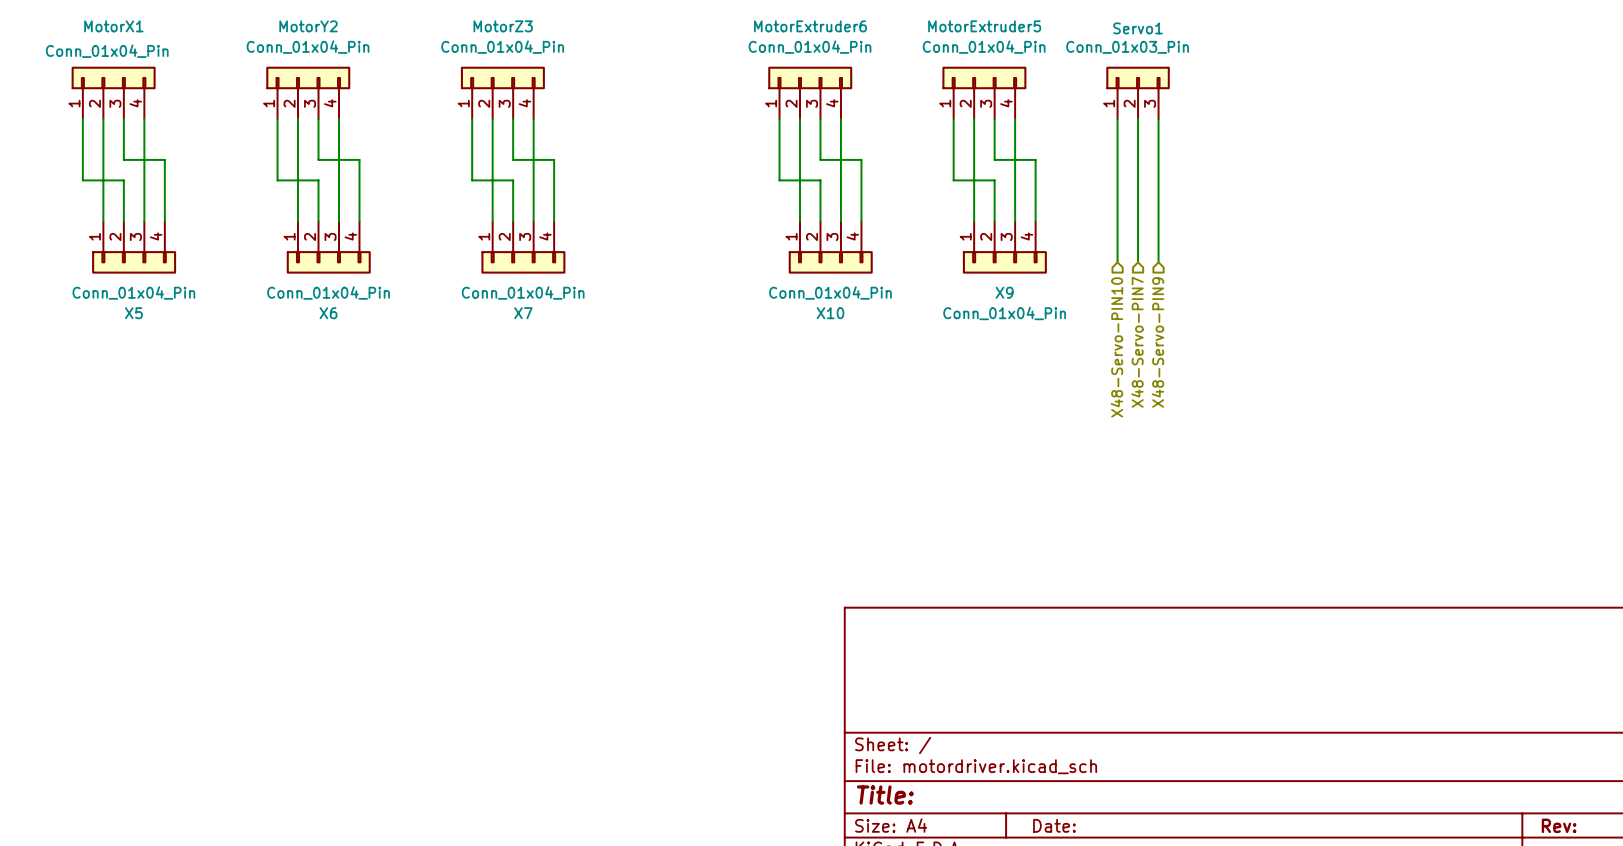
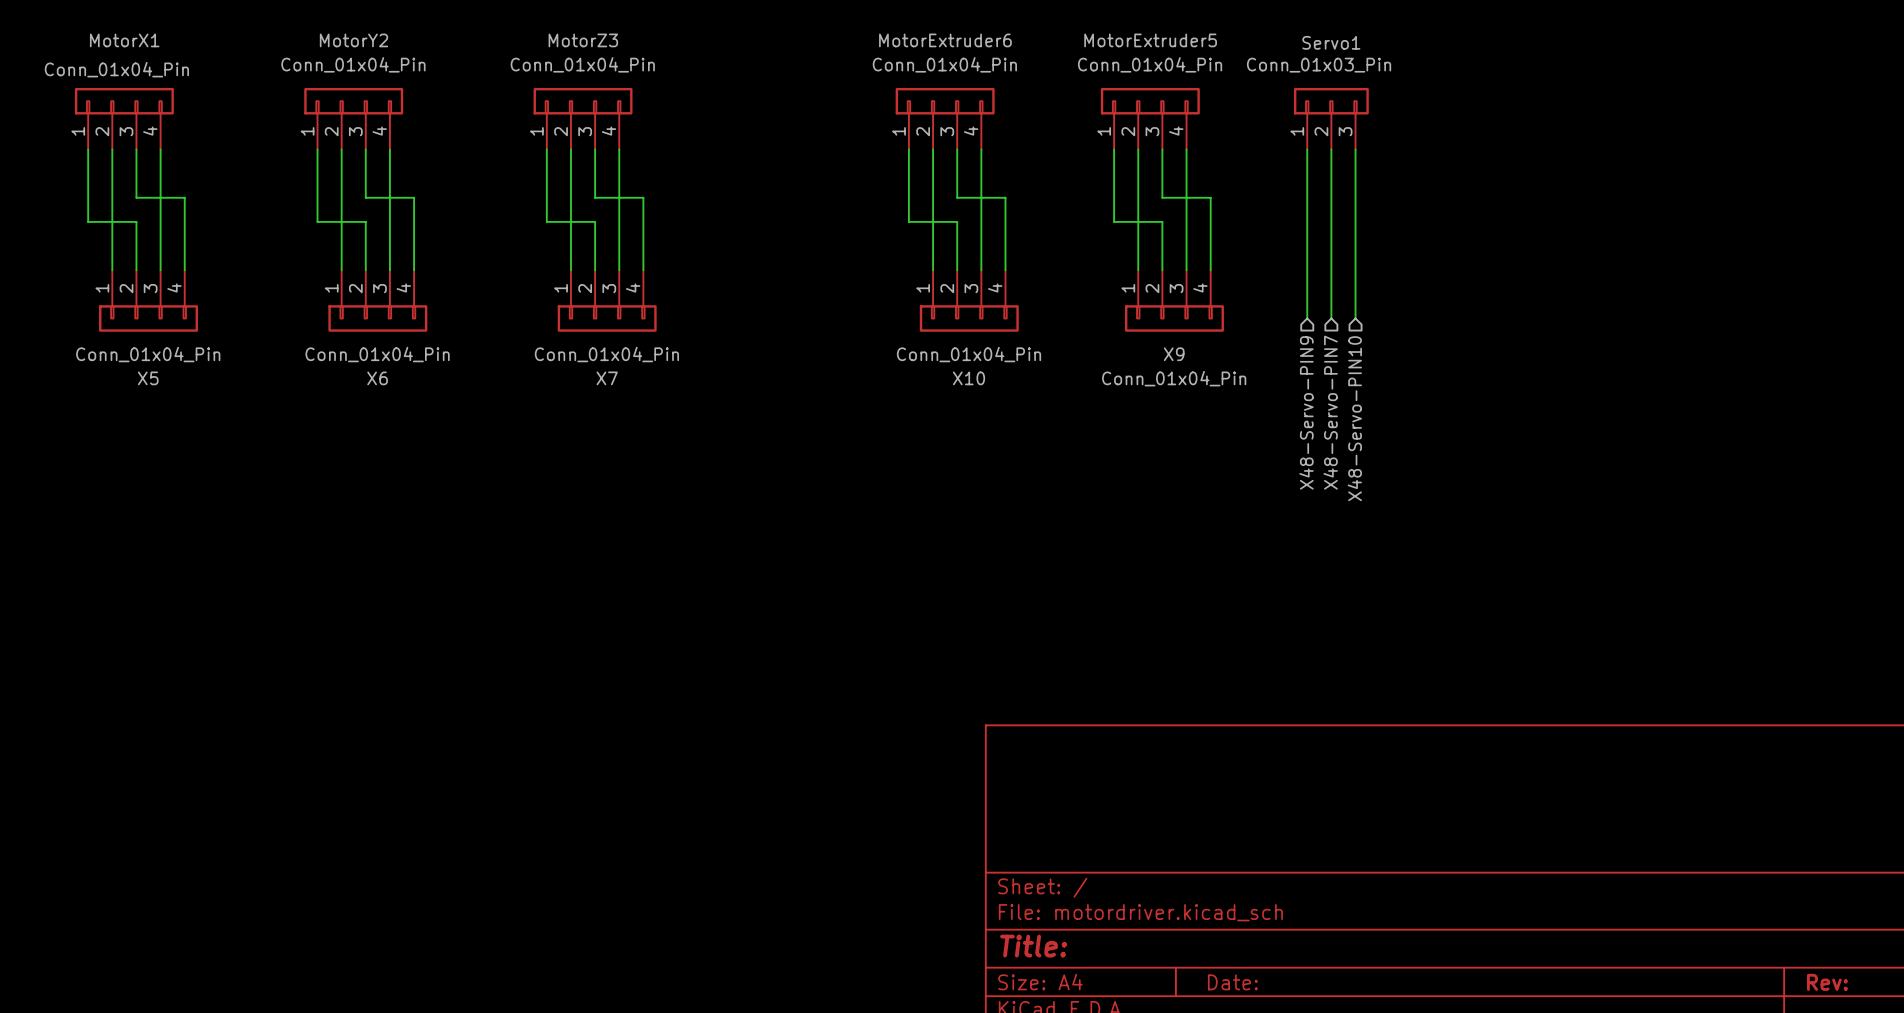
hierarchical label: X48-Servo-PIN9 (1157, 342) -> X48-Servo-PIN10 (1354, 418)
hierarchical label: X48-Servo-PIN10 (1116, 347) -> X48-Servo-PIN9 (1306, 412)

